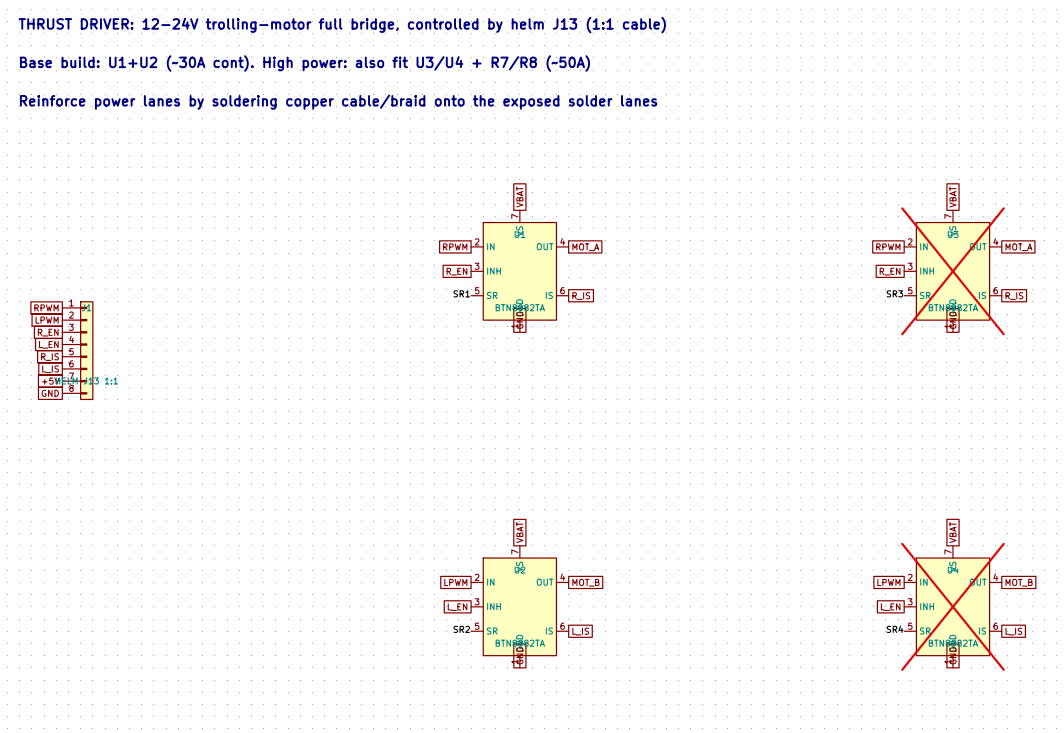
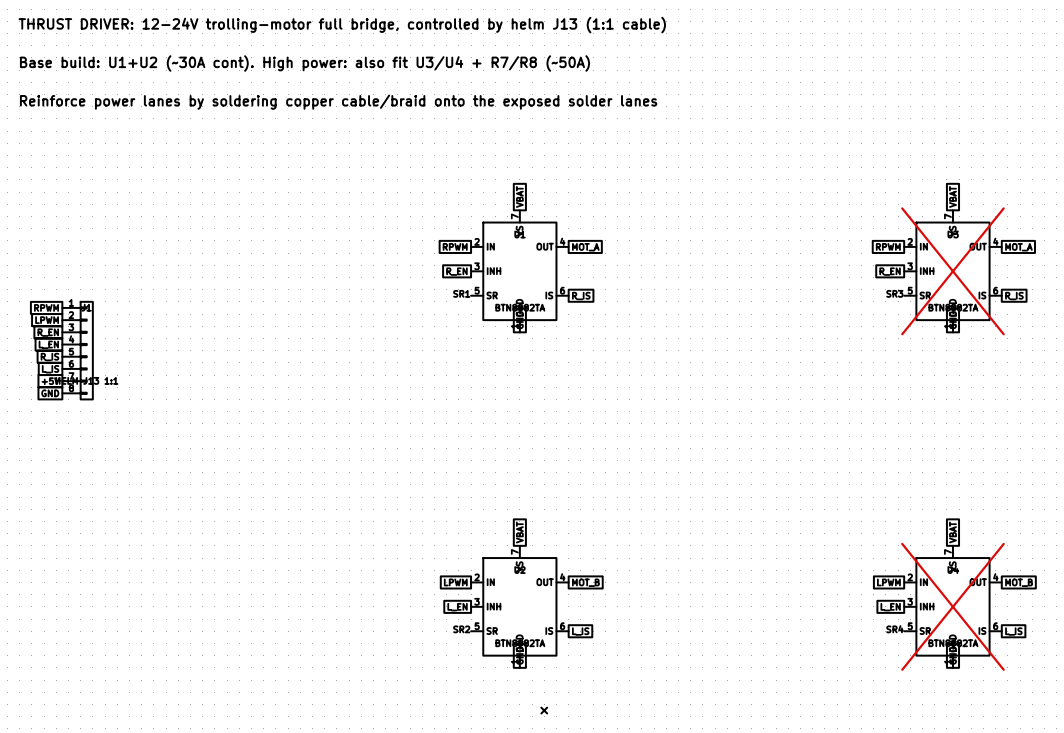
no-connect mark: none -> (544, 710)

